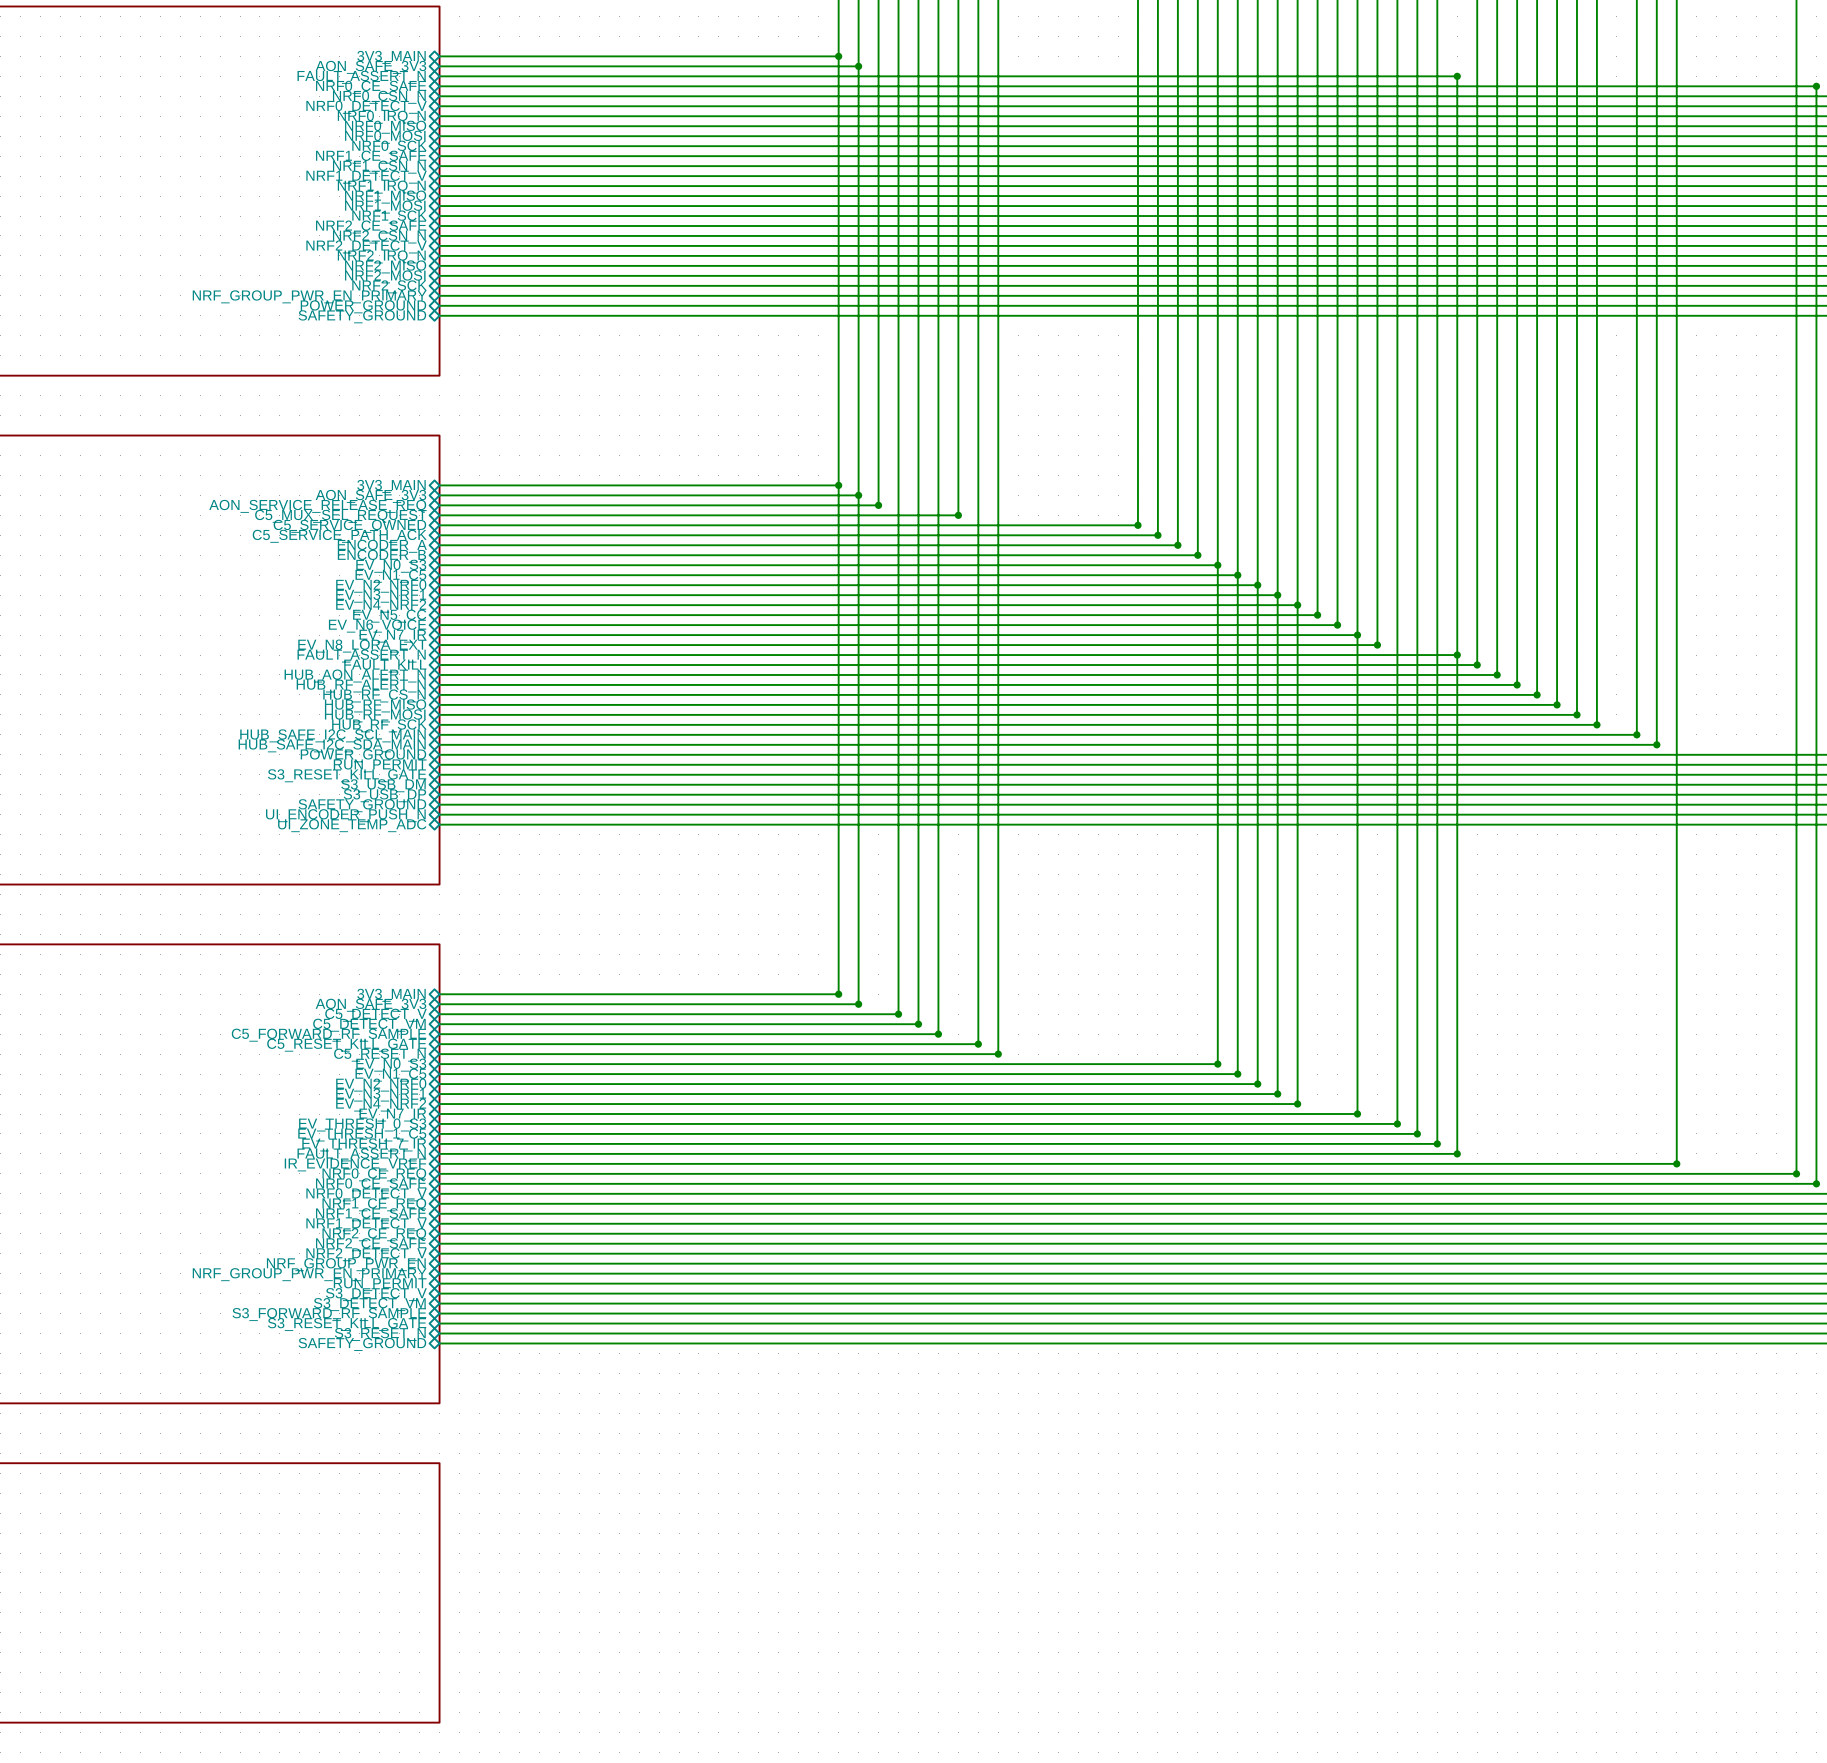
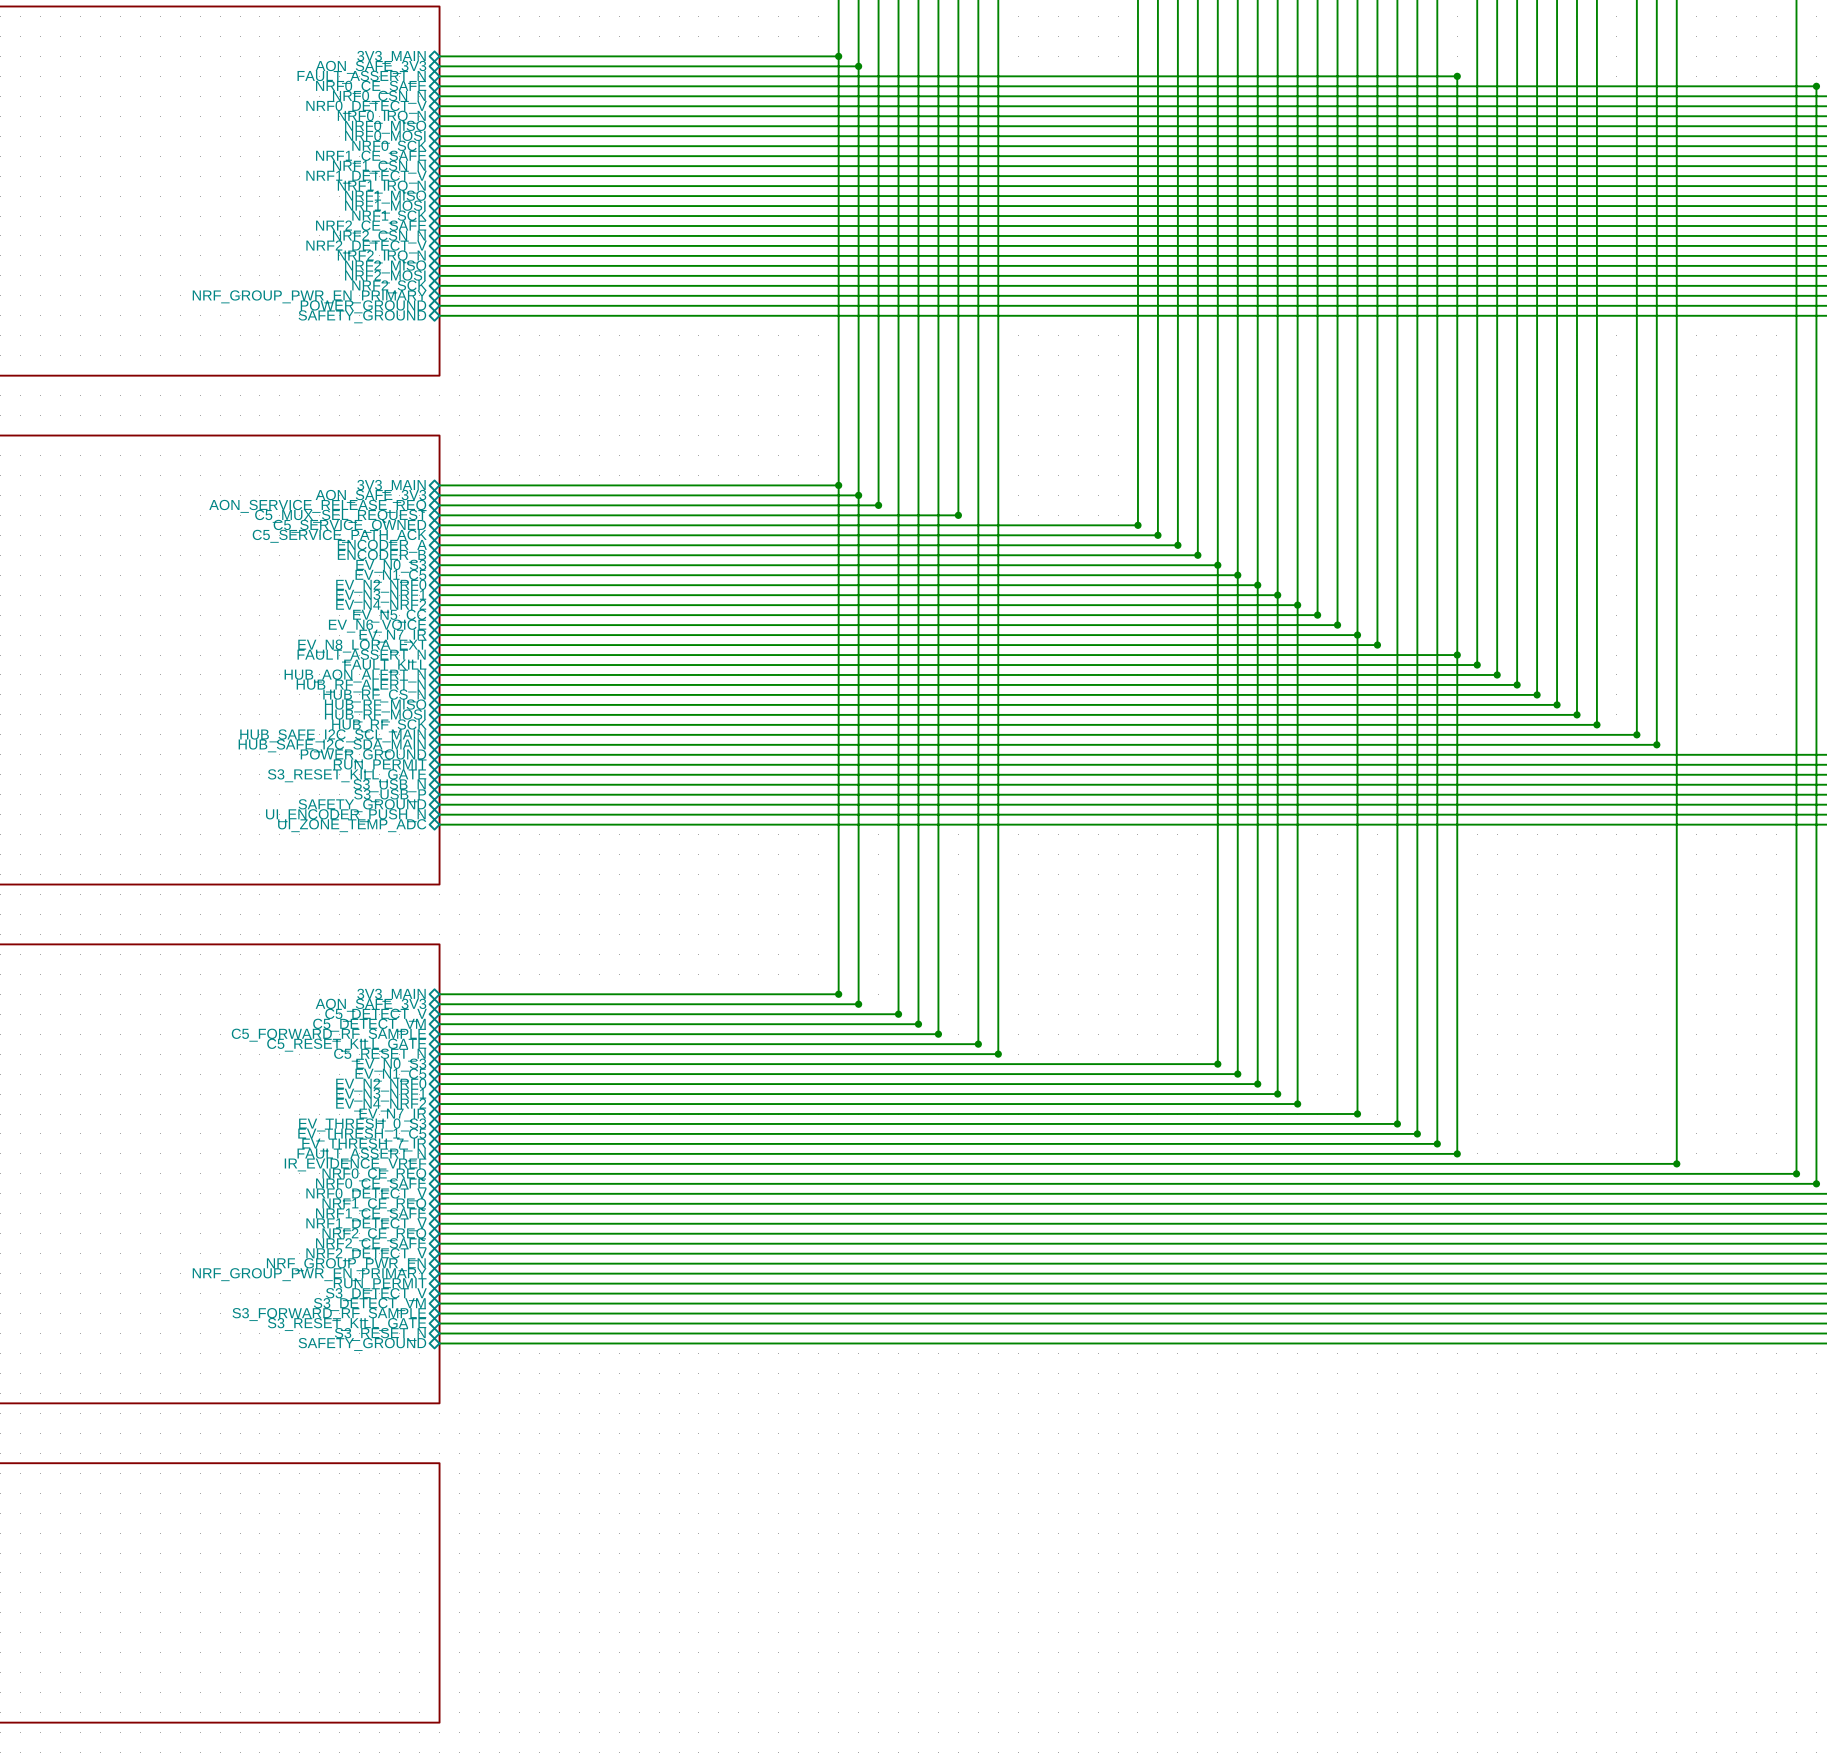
sheet pin: S3_USB_DM (383, 785) -> S3_USB_N (389, 785)
sheet pin: S3_USB_DP (384, 795) -> S3_USB_P (390, 795)

